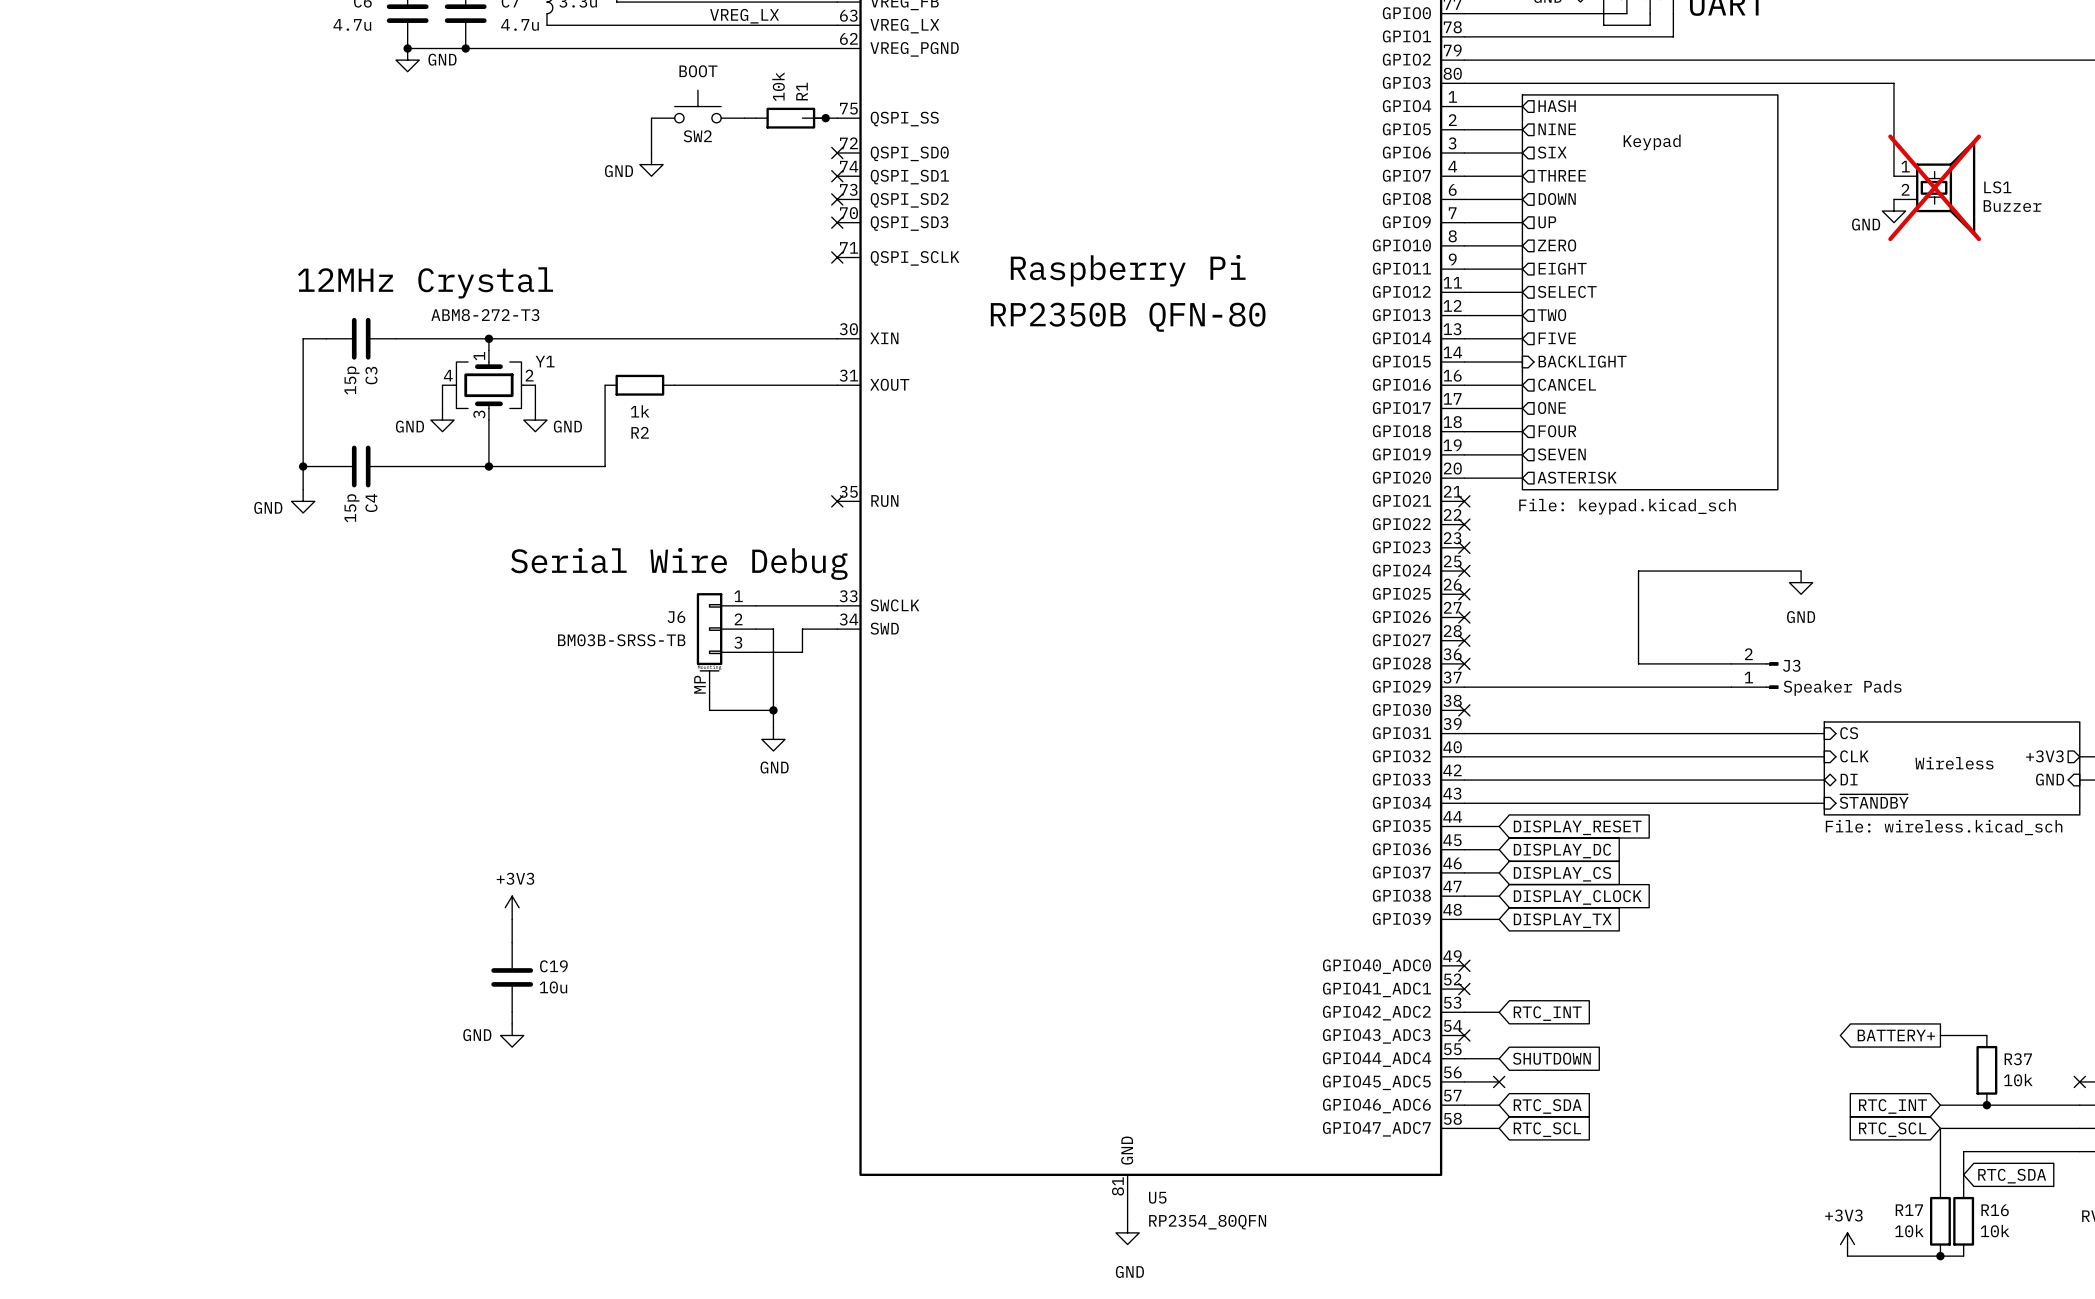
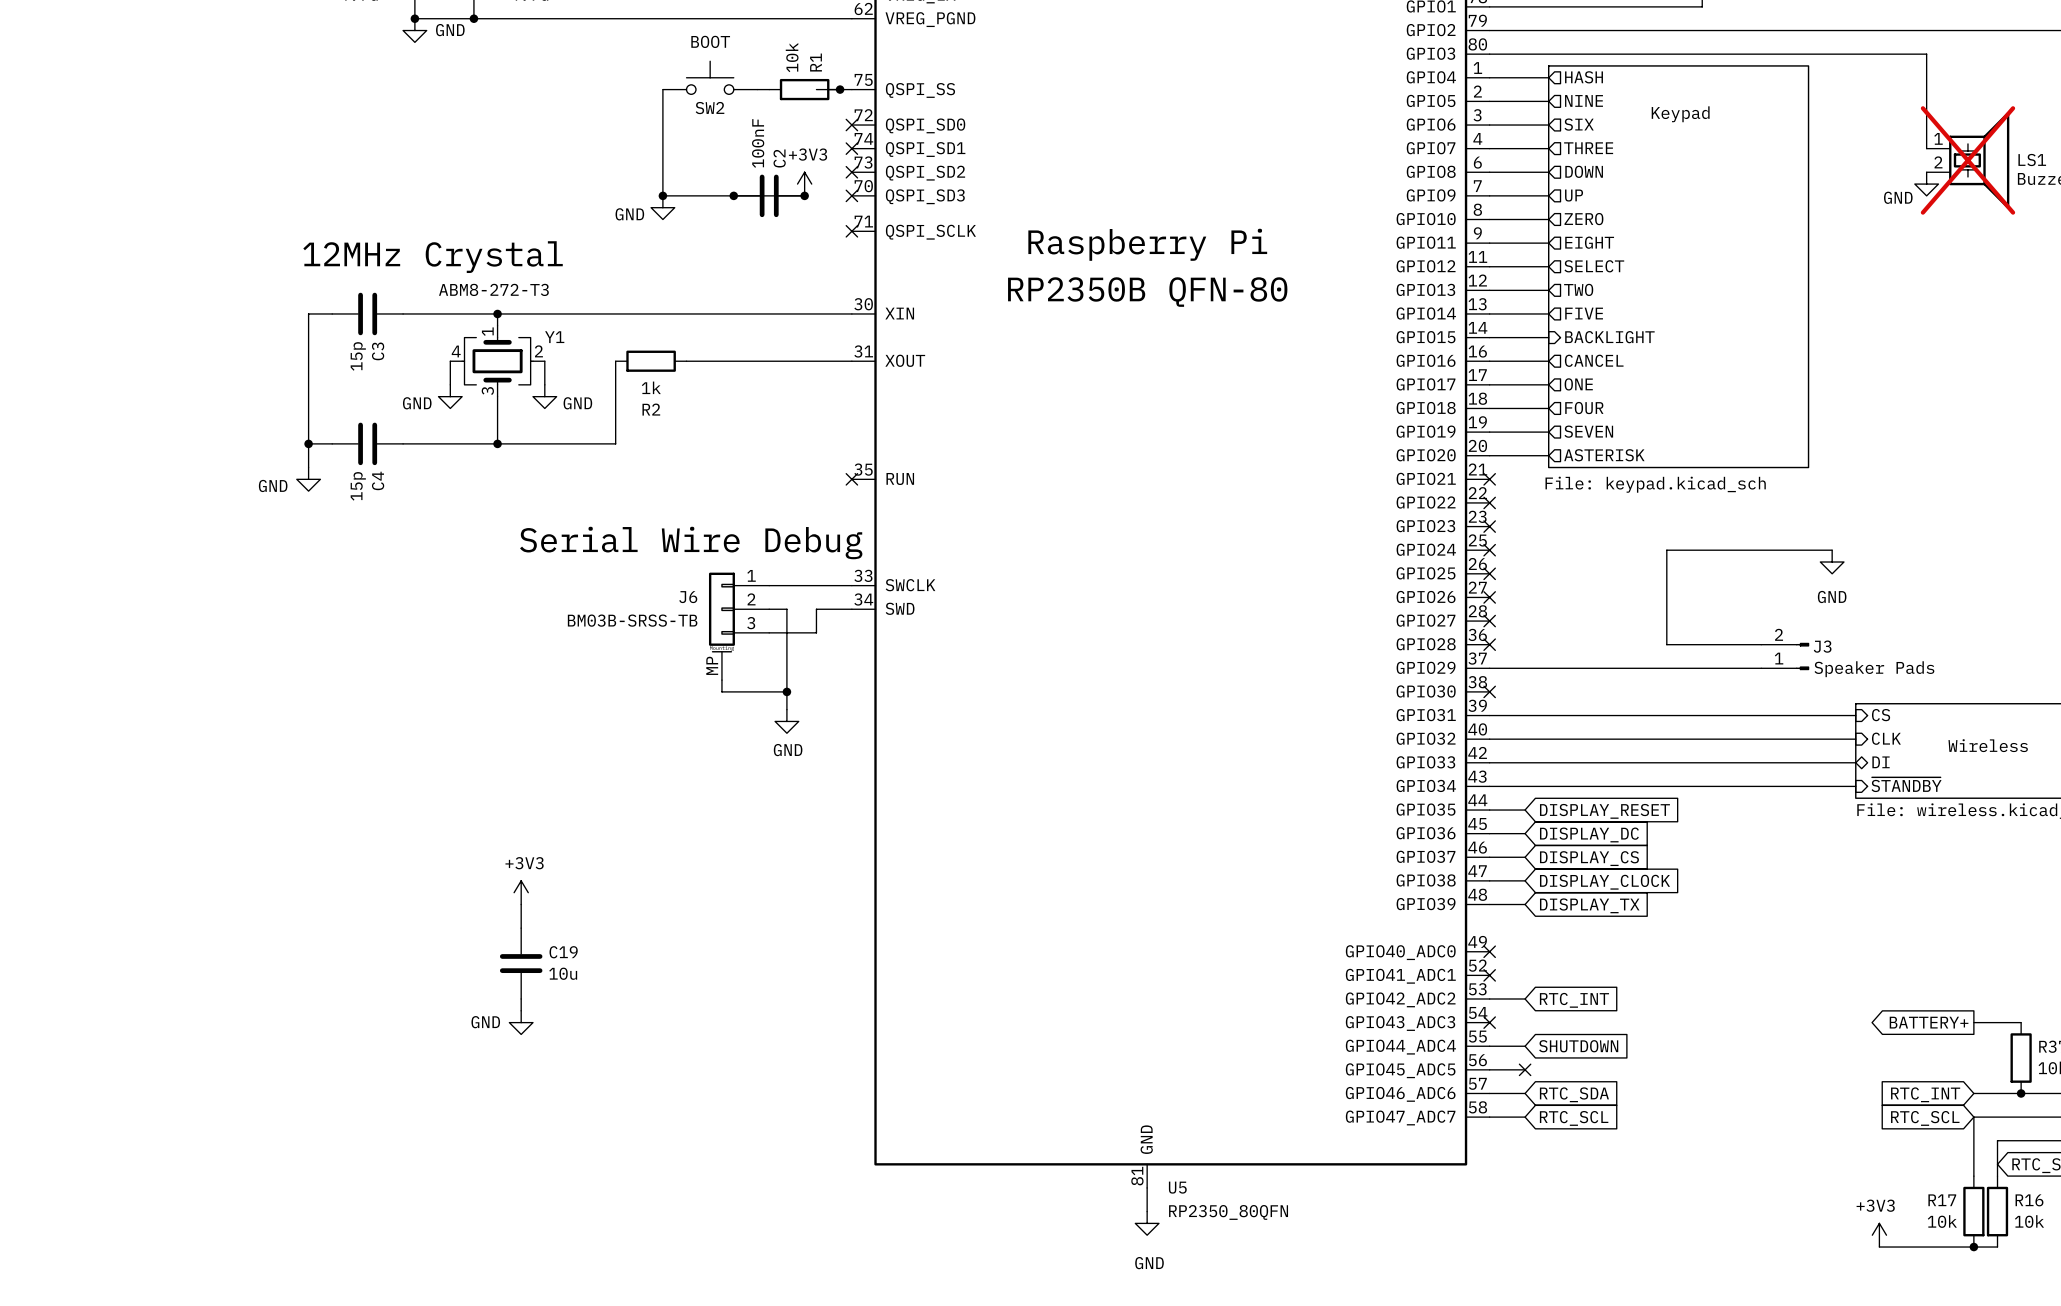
wire: none -> (662, 125) (662, 195) (804, 195)
power symbol position: GND (651, 164) -> GND (662, 207)
power symbol: none -> +3V3 (804, 184)
junction: none -> (662, 195)
junction: none -> (733, 195)
C2: none -> 100nF (769, 195)
junction: none -> (804, 195)
U5 value: RP2354_80QFN (1207, 1222) -> RP2350_80QFN (1228, 1212)

